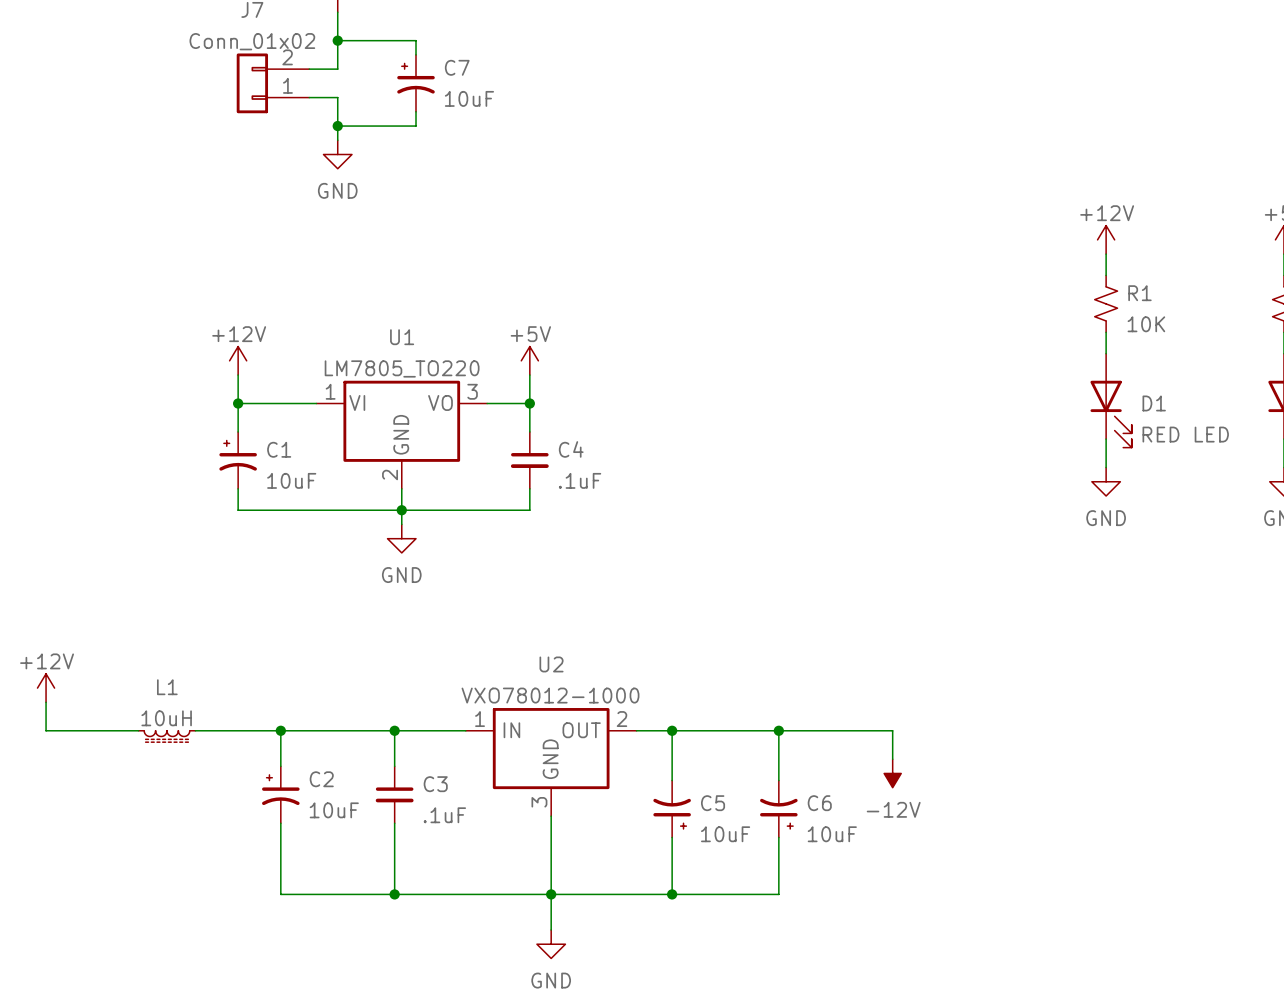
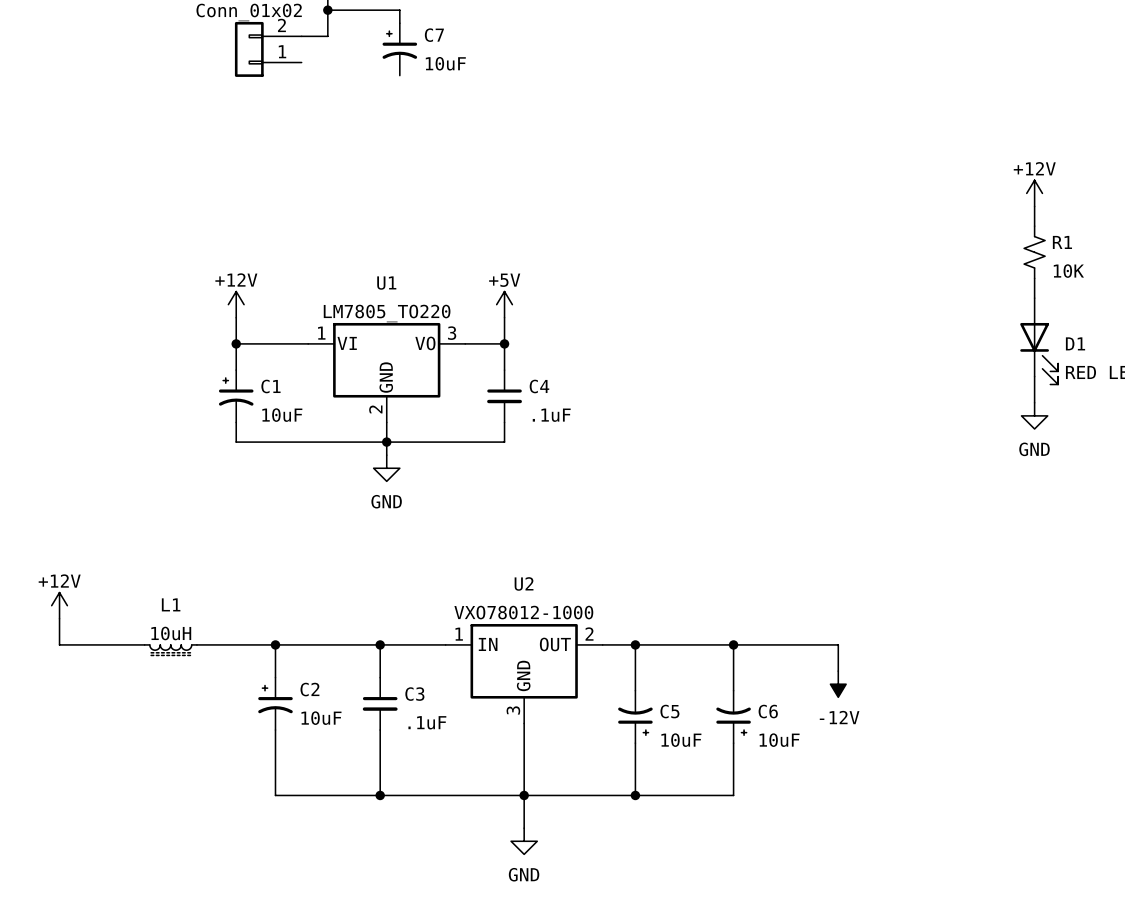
wire: (309, 97) (337, 97) (337, 140) -> none
wire: (416, 111) (416, 126) (337, 126) -> none
junction: (337, 126) -> none
power symbol: GND (337, 154) -> none

